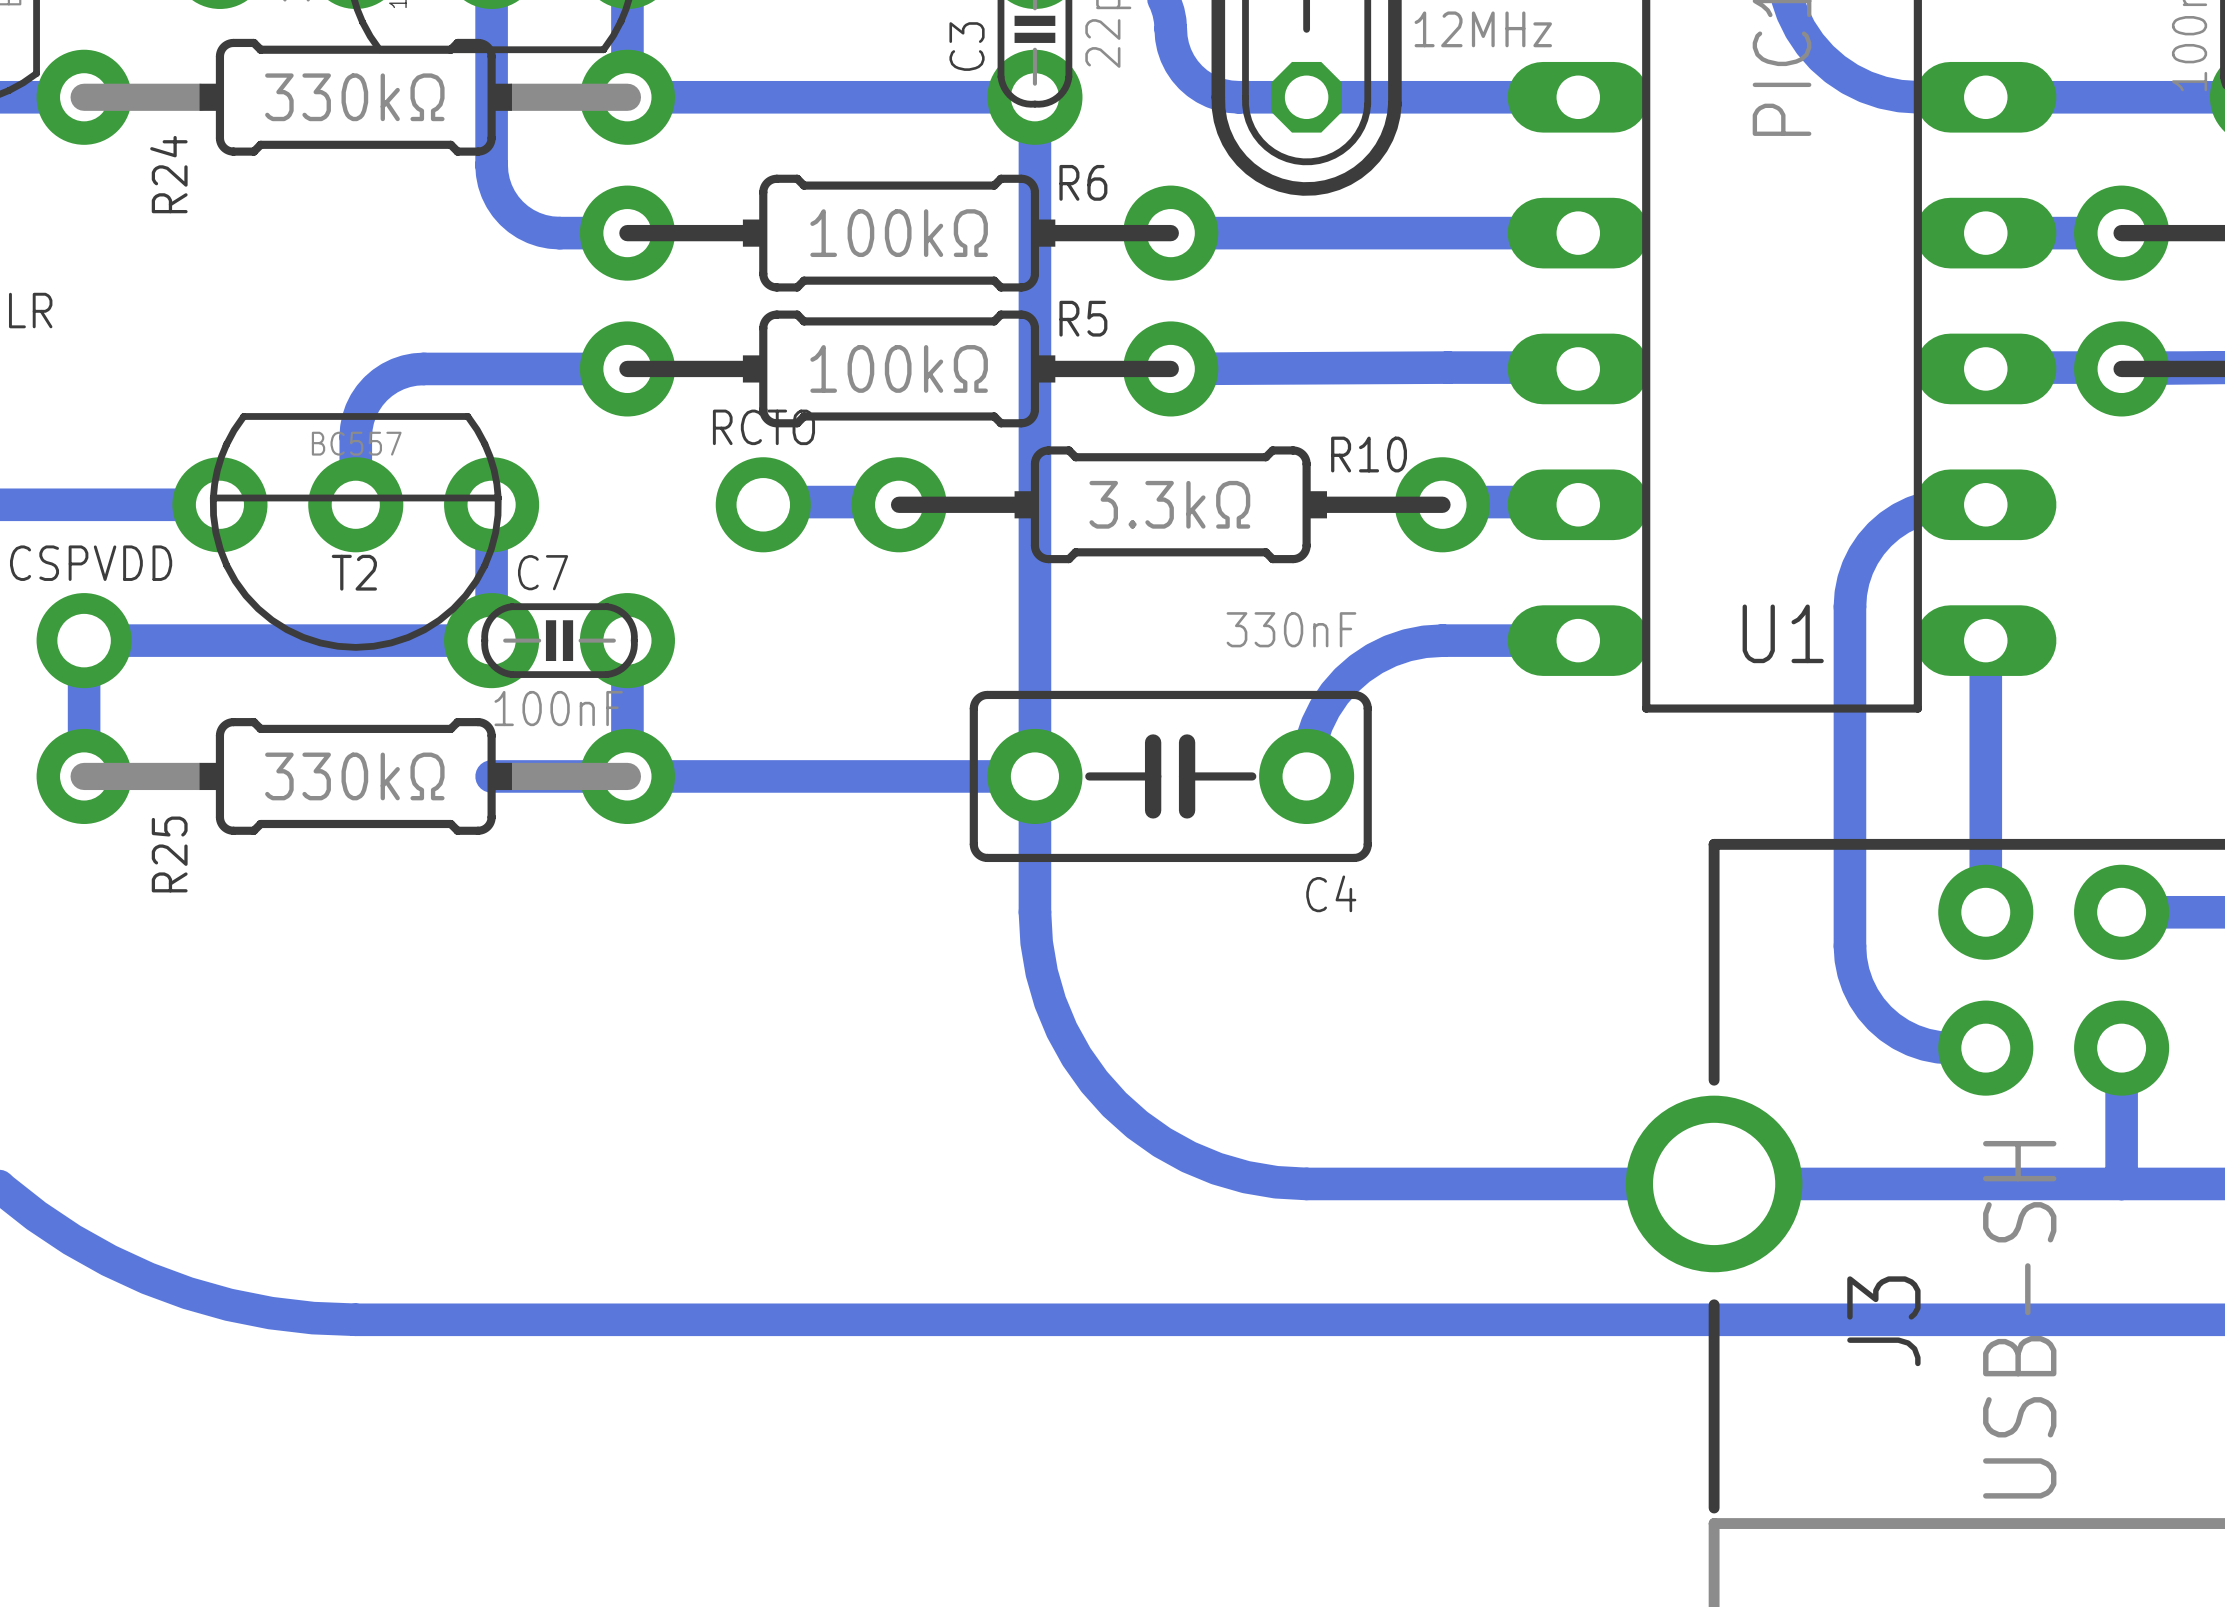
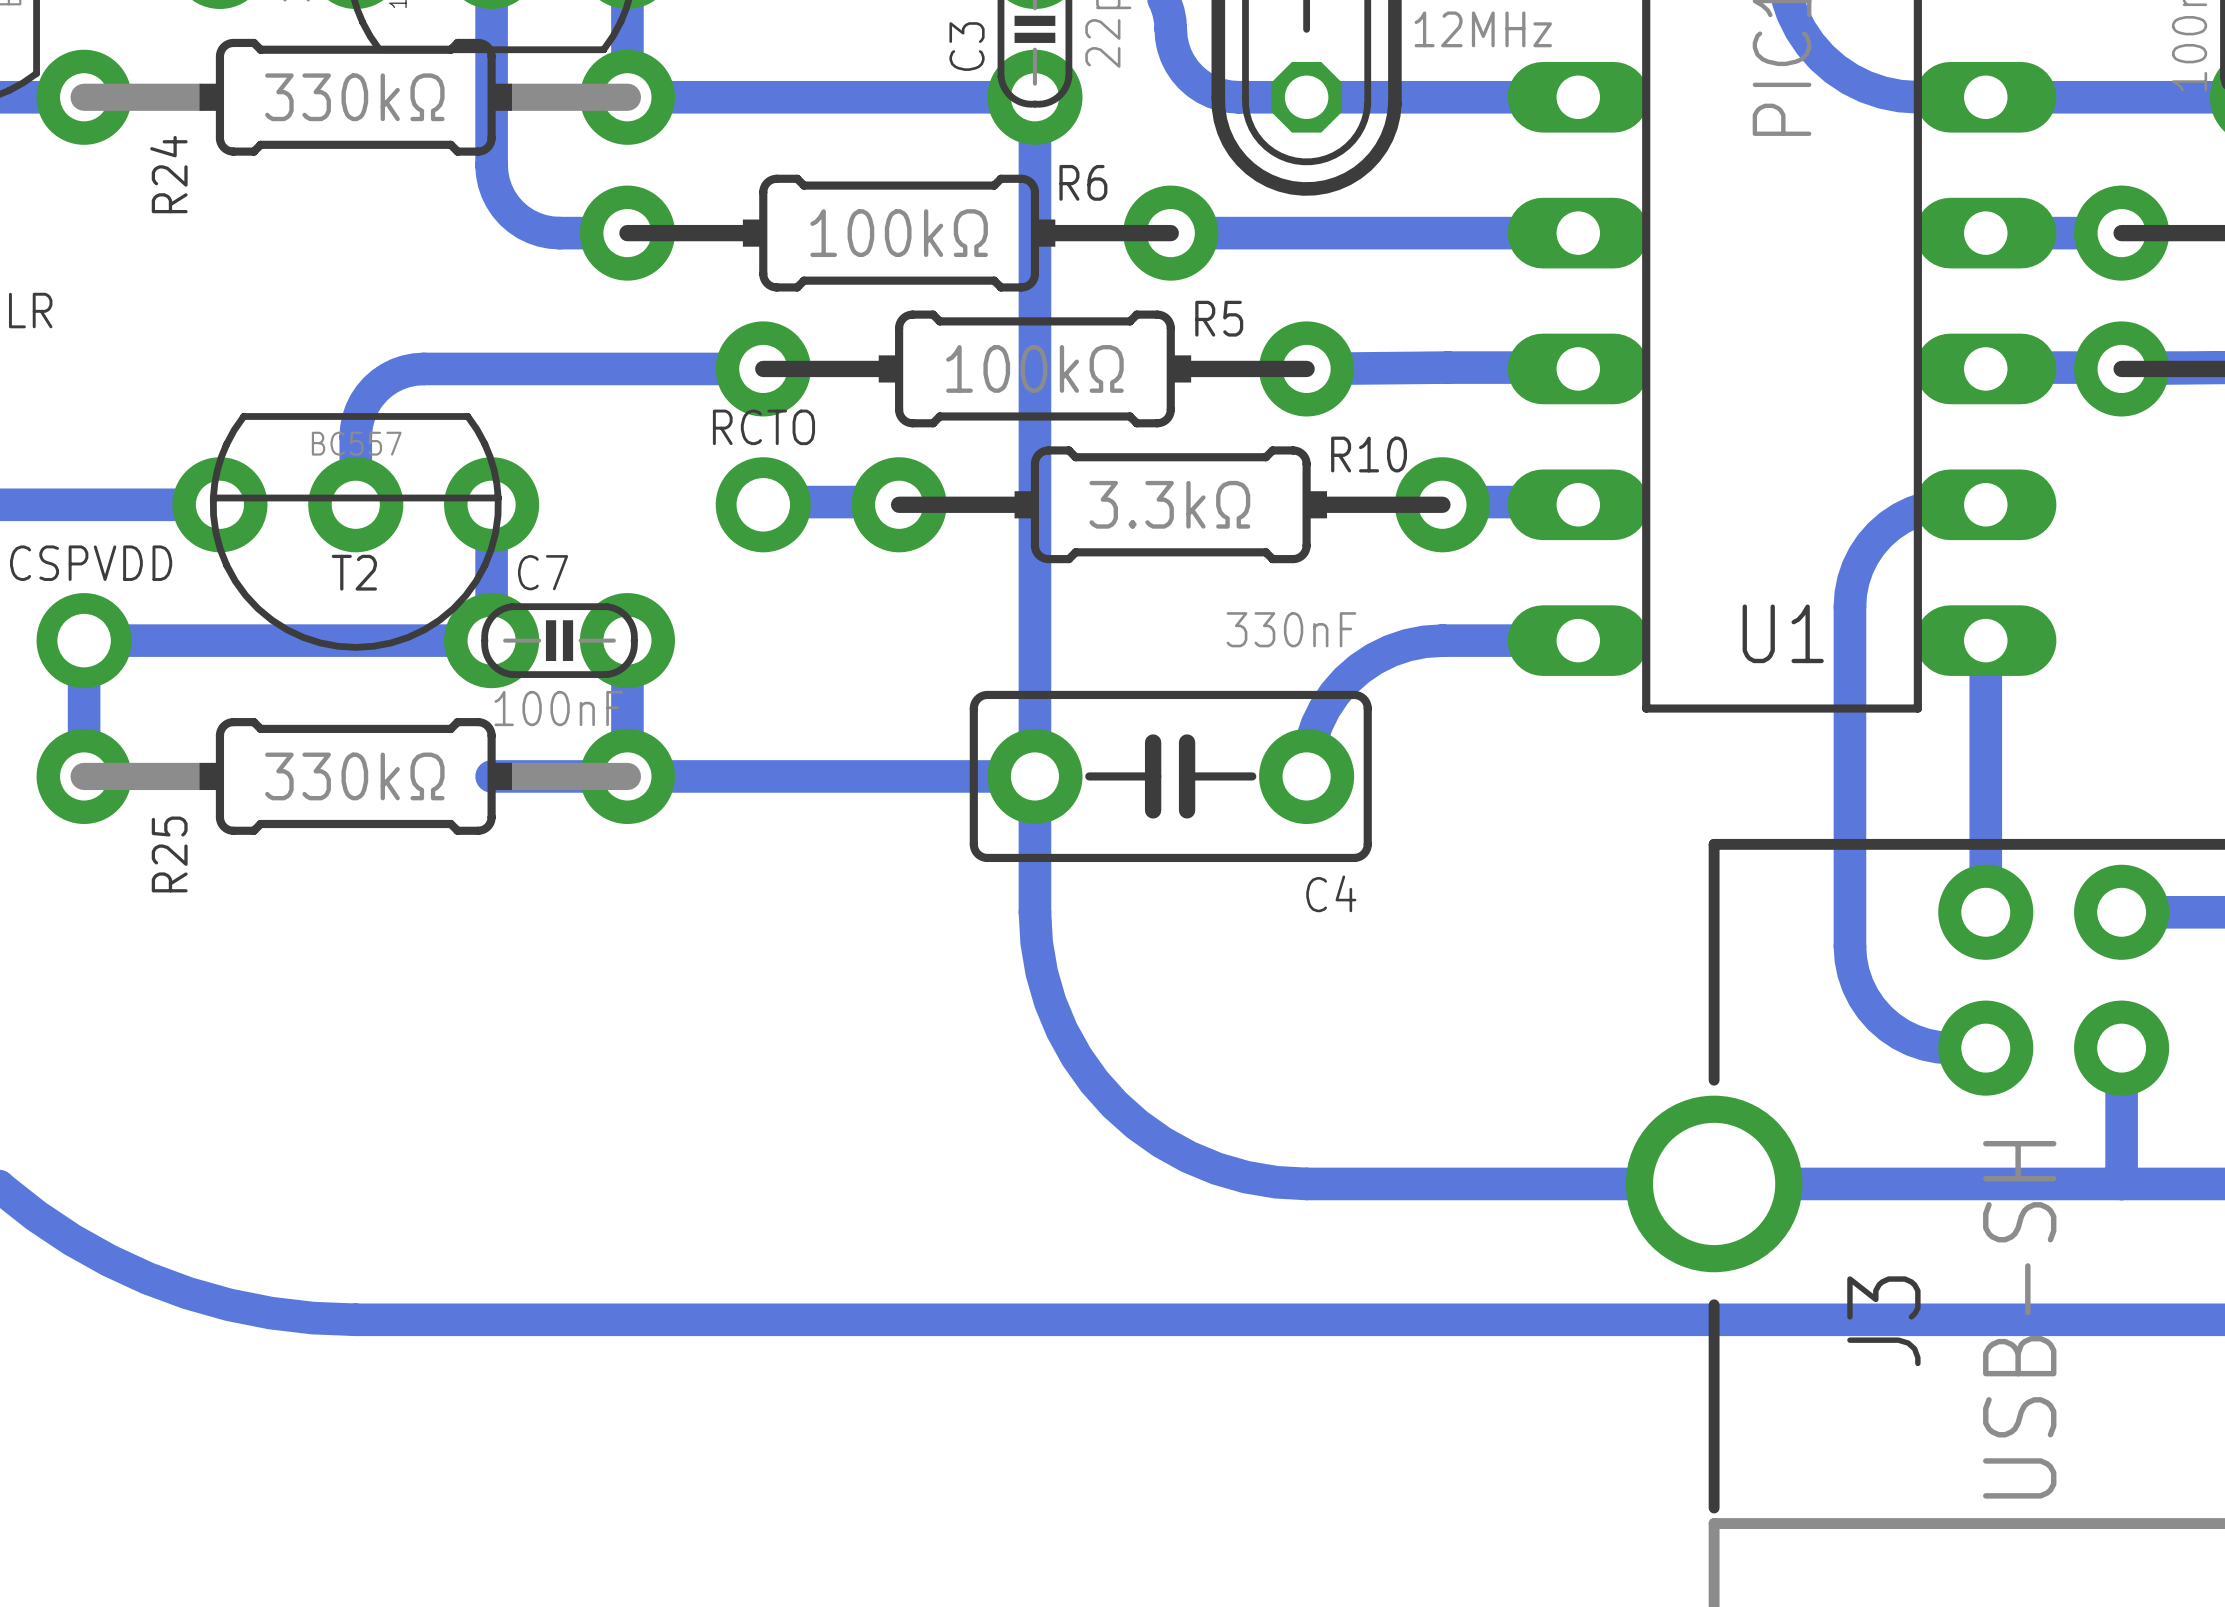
bottom track: (1447, 367) (1170, 368) -> (1447, 367) (1306, 368)
bottom track: none -> (627, 368) (763, 368)
R5 position: (899, 368) -> (1034, 368)

